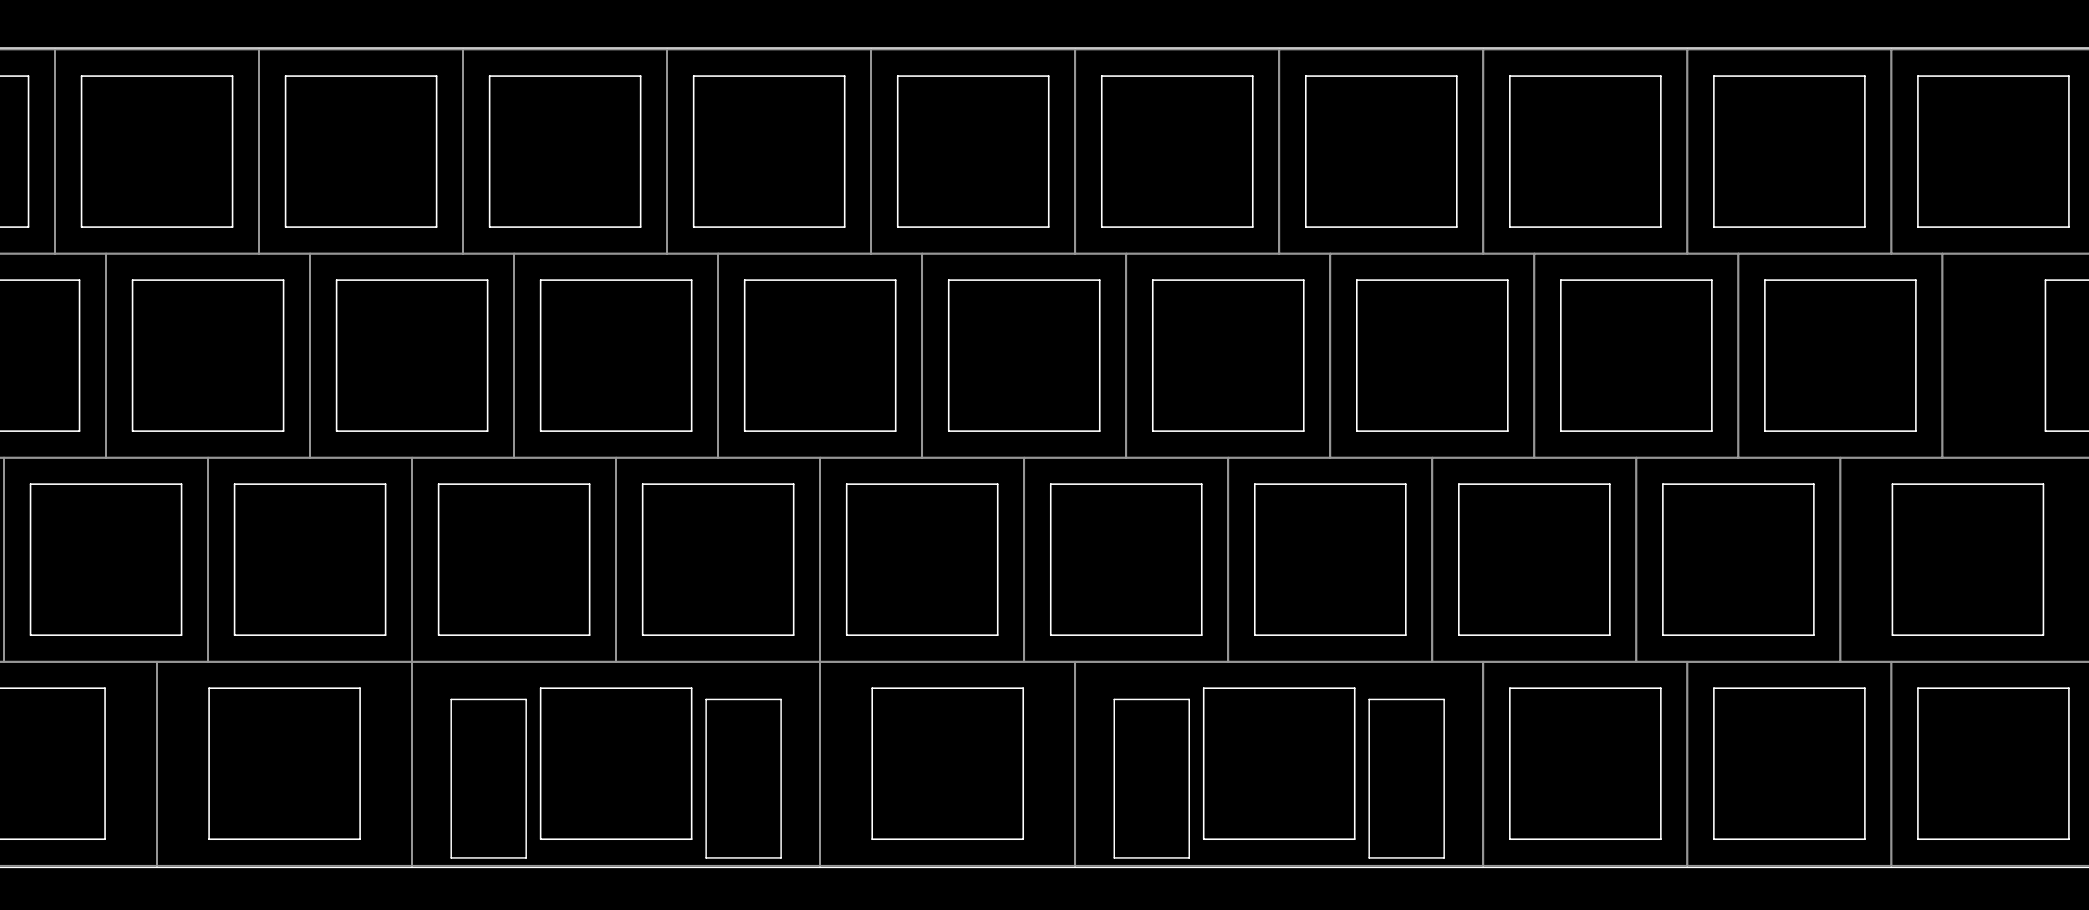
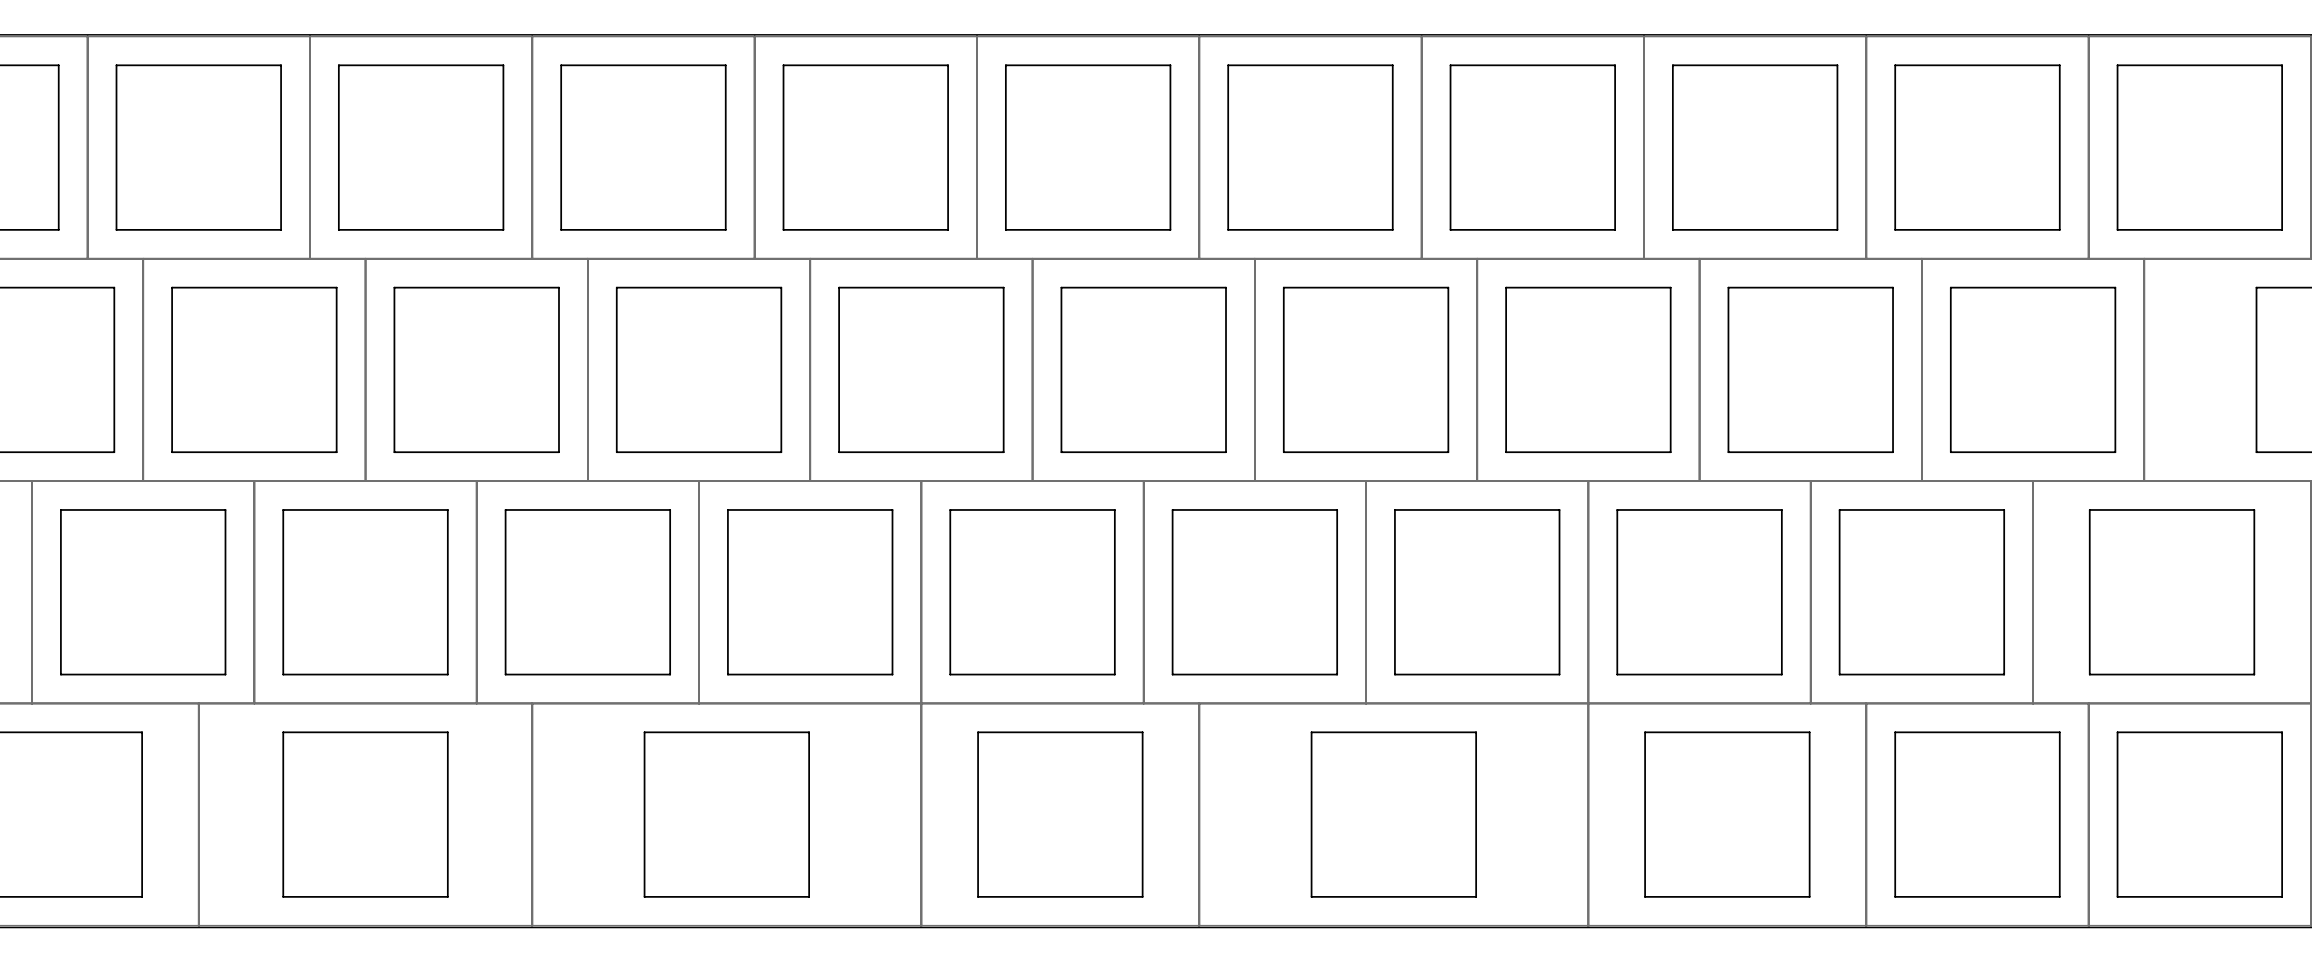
drawing: [156, 660, 821, 867] -> none
drawing: none -> [197, 702, 923, 927]
drawing: [1074, 660, 1689, 867] -> none
drawing: none -> [1198, 702, 1868, 927]

